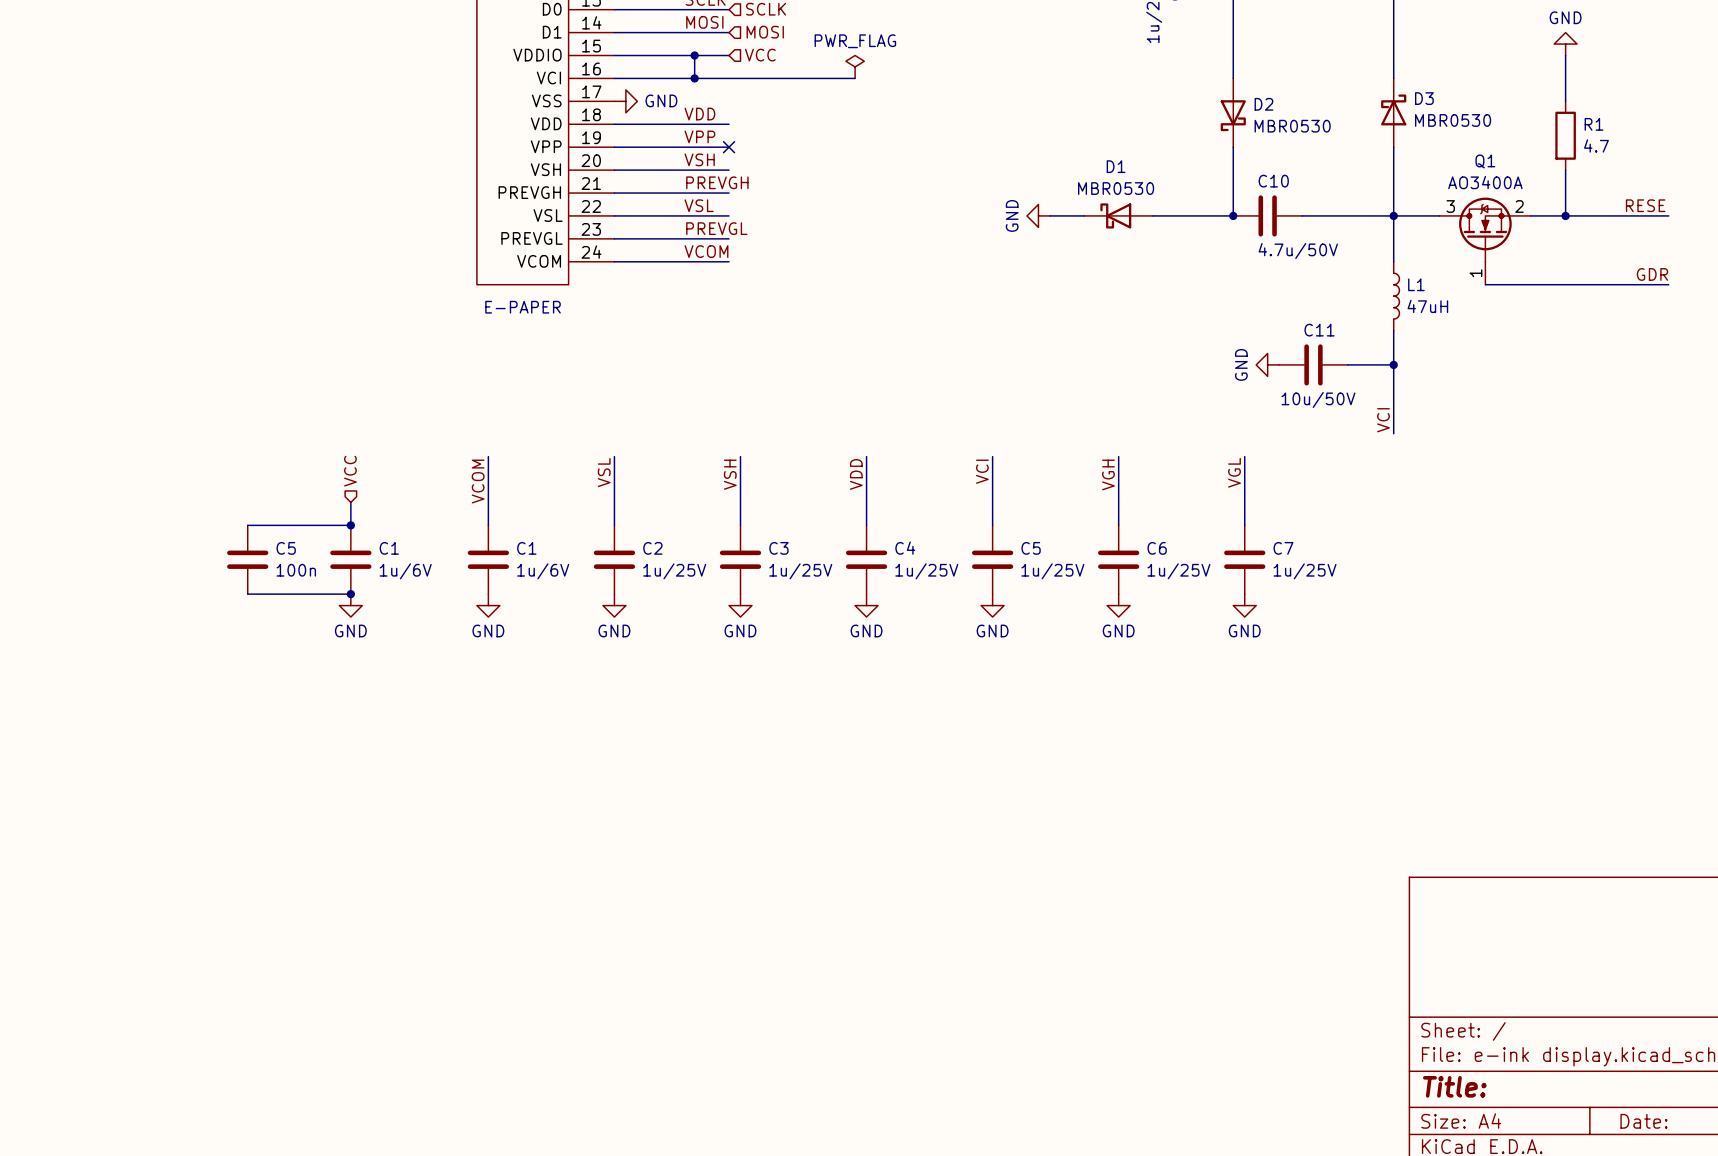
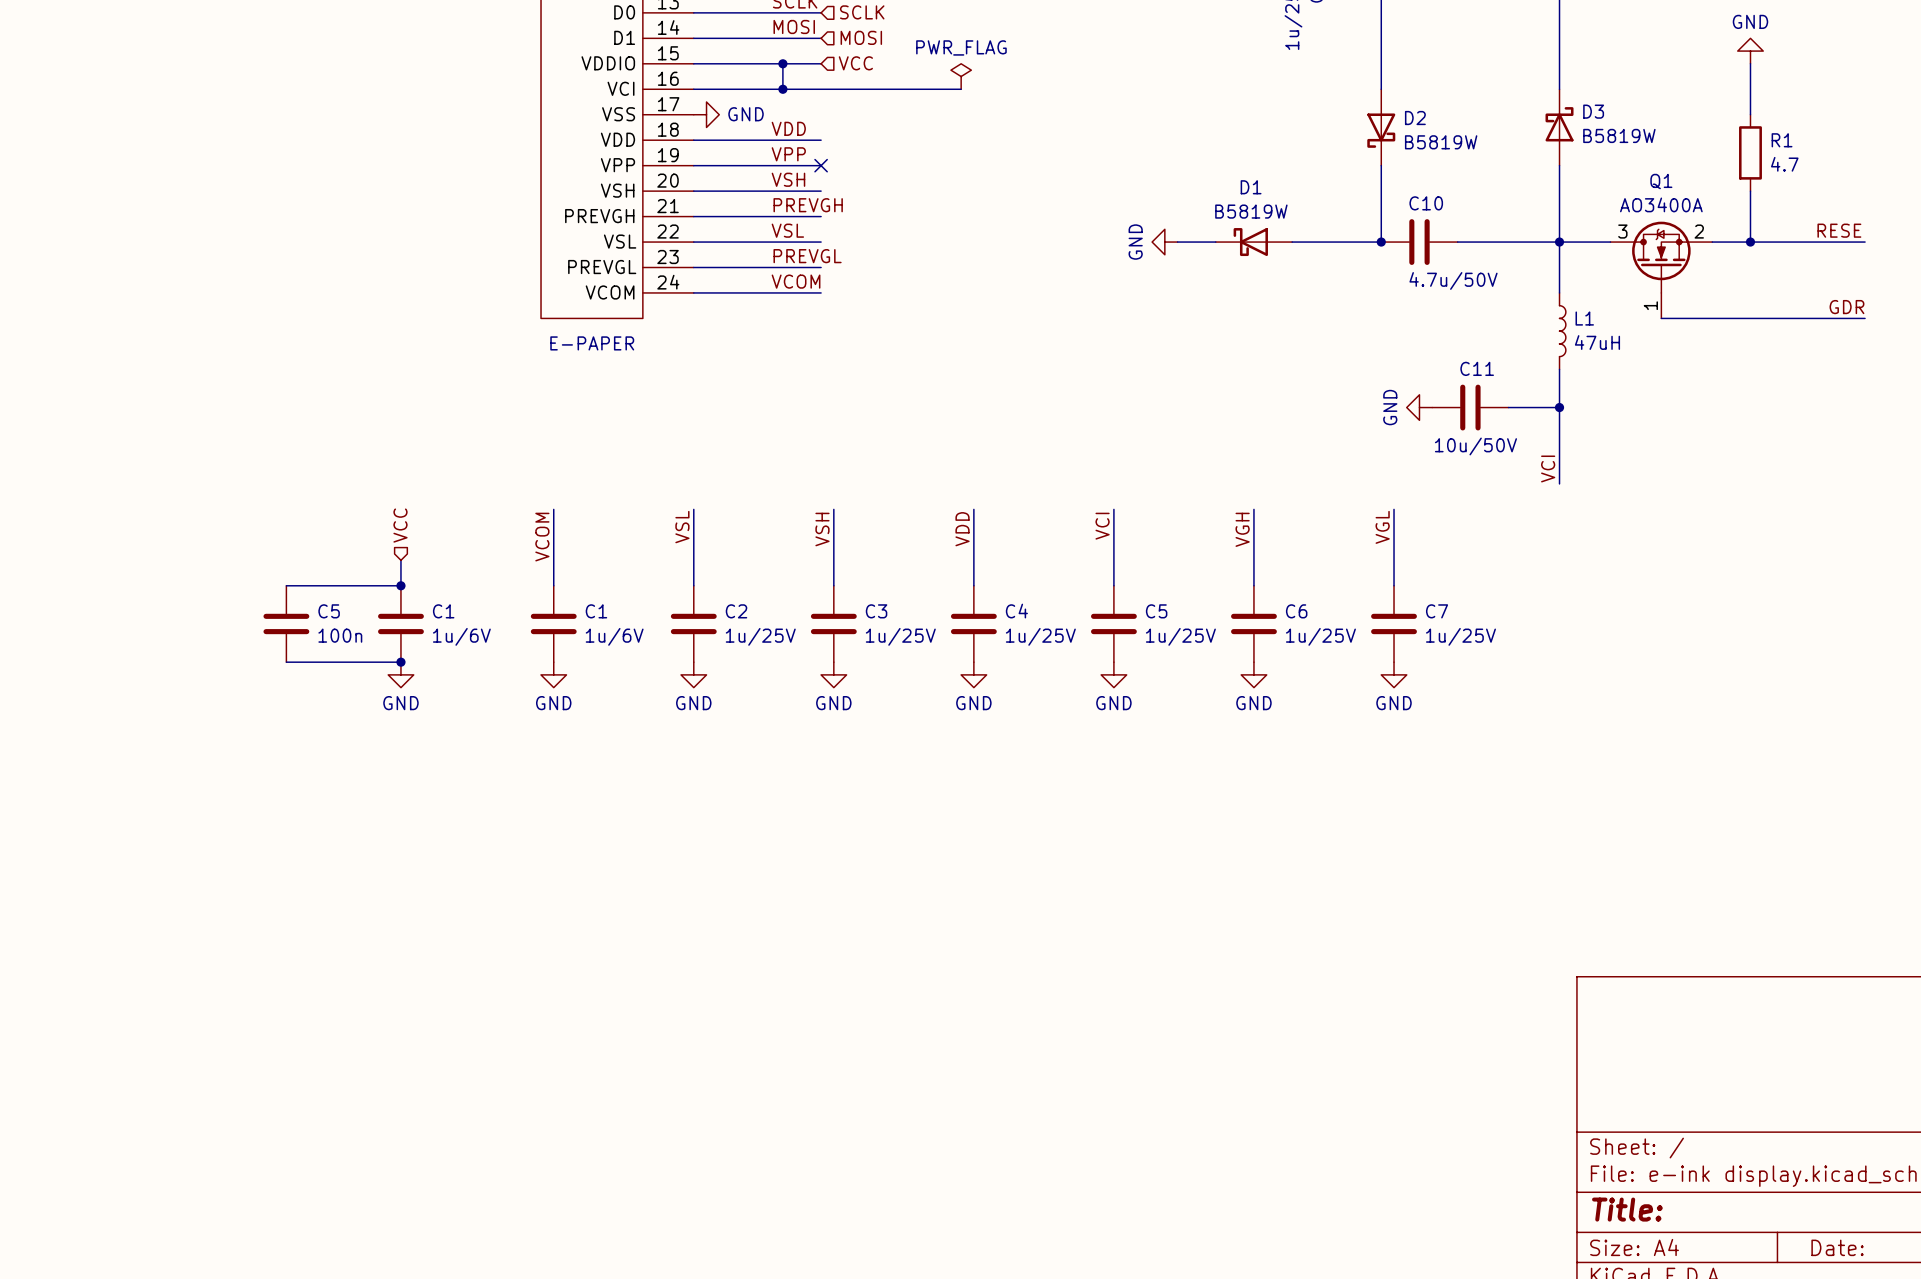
D3 value: MBR0530 (1453, 120) -> B5819W (1619, 135)
D2 value: MBR0530 (1292, 126) -> B5819W (1441, 142)
D1 value: MBR0530 (1116, 188) -> B5819W (1251, 211)

